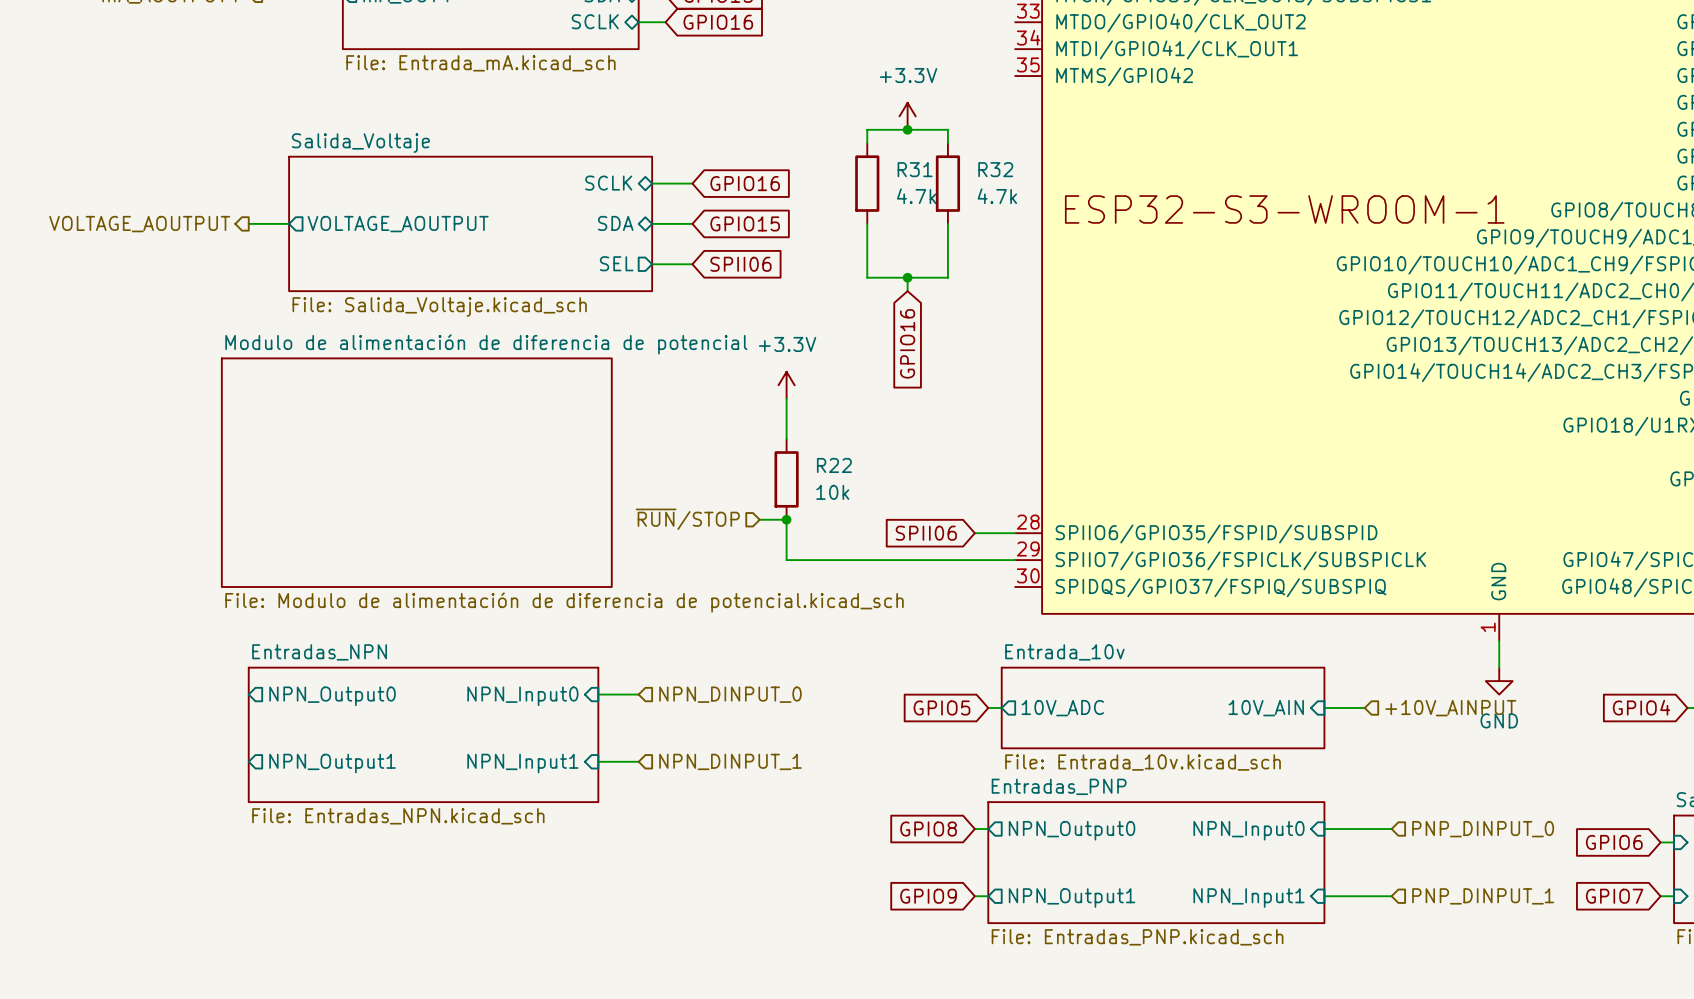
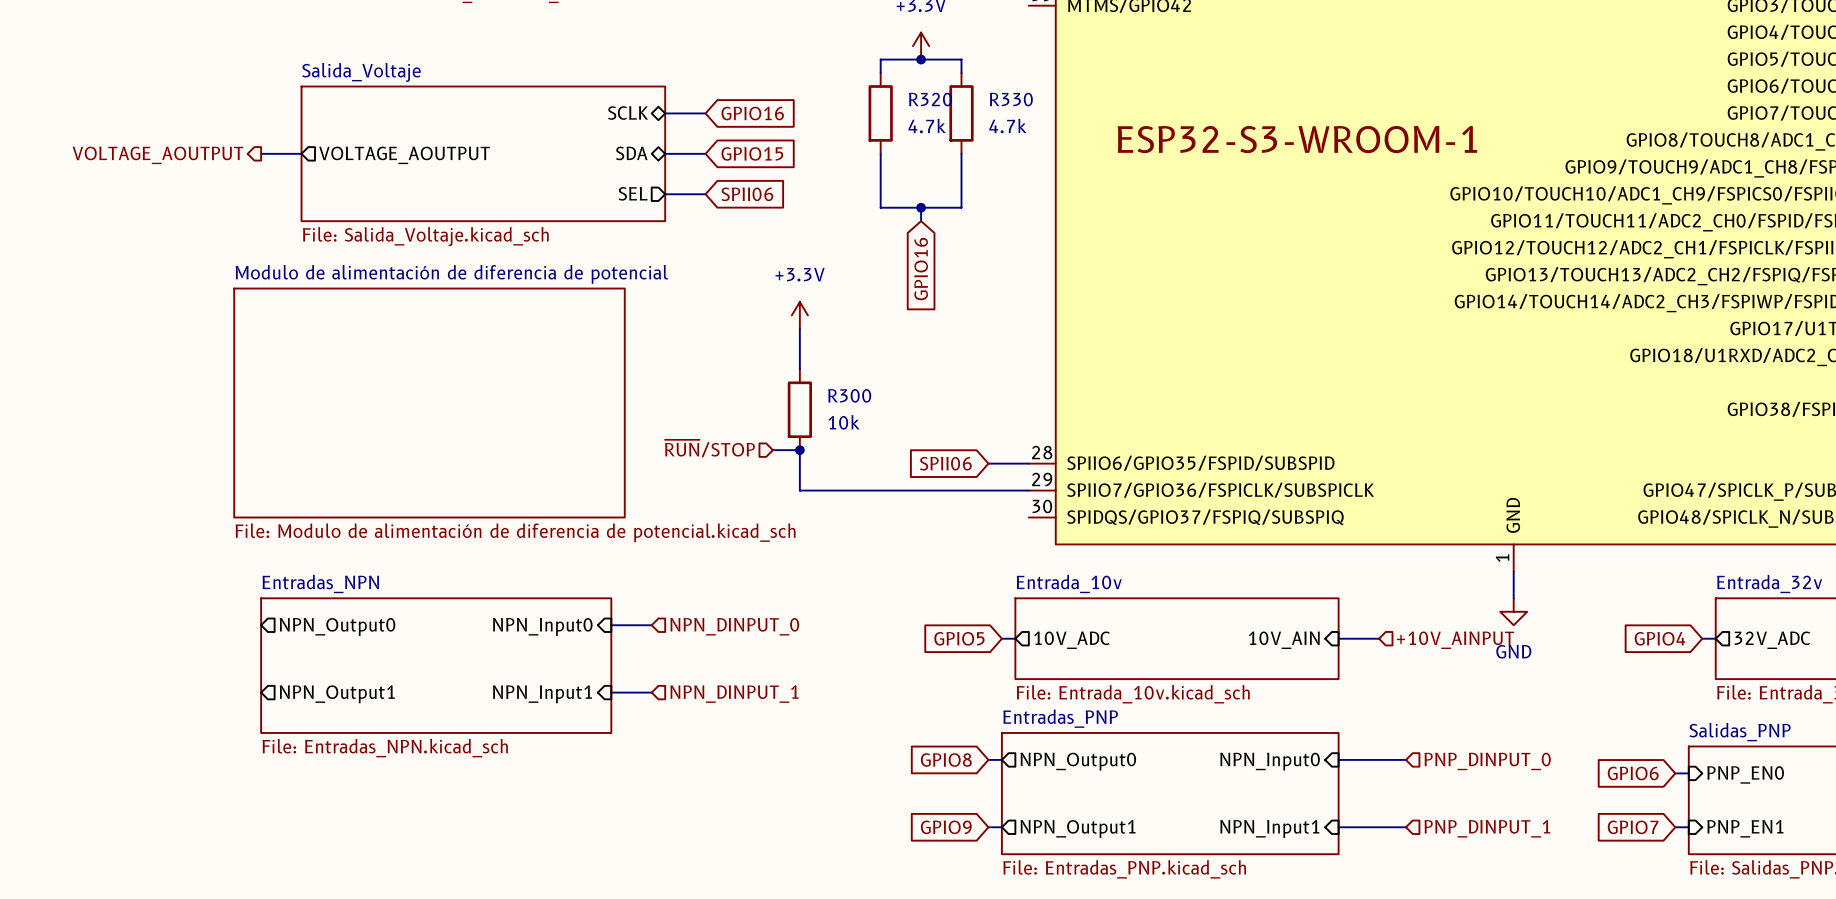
R31 name: R31 (915, 169) -> R320 (930, 99)
R32 name: R32 (995, 169) -> R330 (1011, 99)
R22 name: R22 (834, 465) -> R300 (849, 395)

